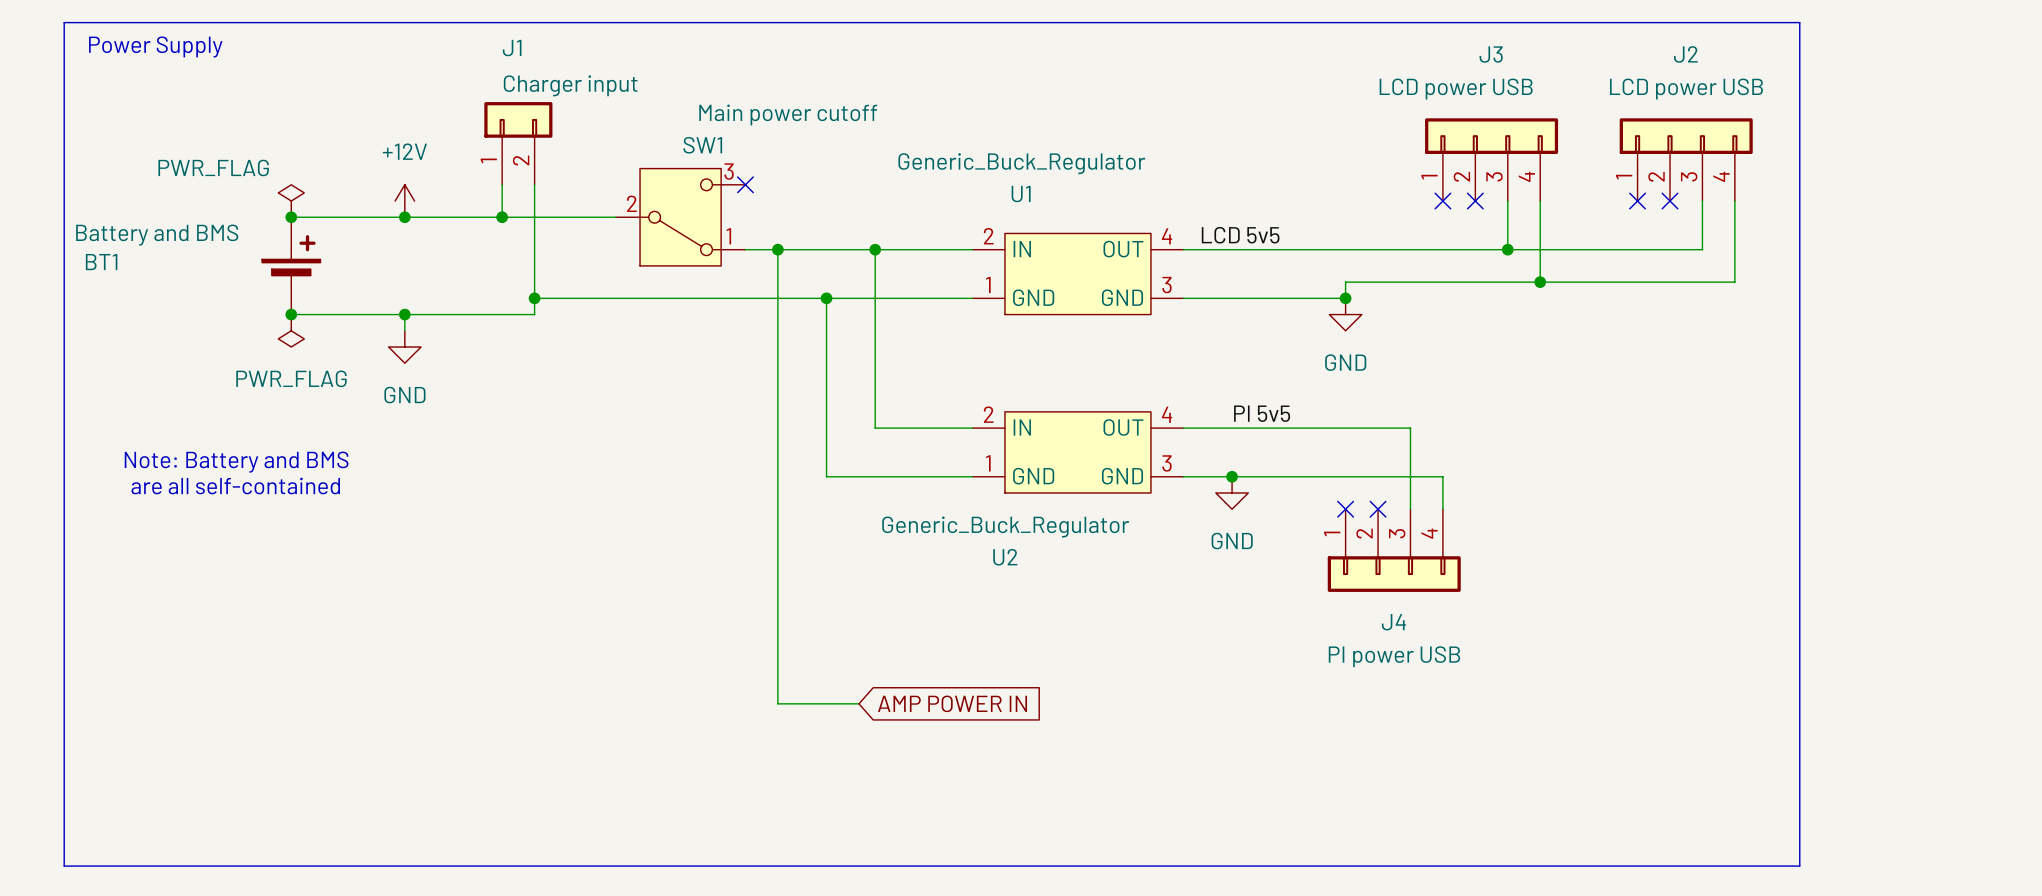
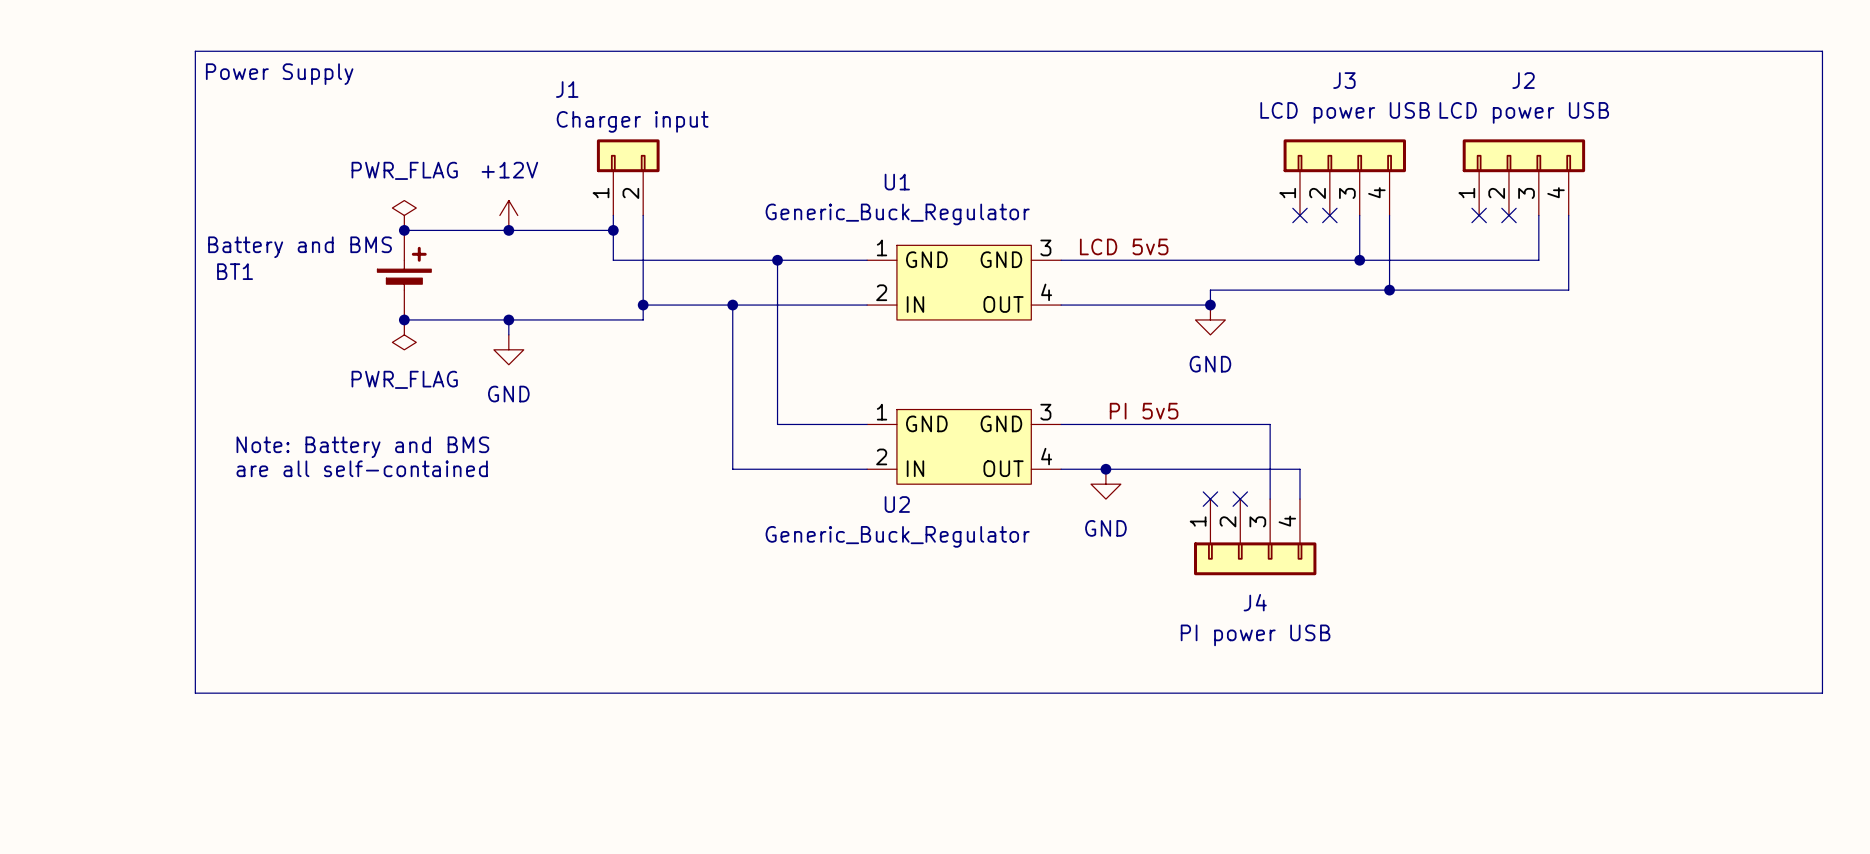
line: (242, 22) (64, 22) (64, 866) (1799, 866) (1799, 22) -> (195, 51) (195, 693) (1822, 693) (1822, 51) (1628, 51)
text position: Power Supply (155, 46) -> Power Supply (279, 74)
J1 name position: J1 (512, 48) -> J1 (567, 89)
J1 value position: Charger input (570, 85) -> Charger input (632, 121)
J3 value position: LCD power USB (1456, 89) -> LCD power USB (1345, 112)
J1 position: (518, 143) -> (628, 177)
U1 value position: Generic_Buck_Regulator (1021, 163) -> Generic_Buck_Regulator (897, 214)
wire: (502, 184) (502, 217) -> none
wire: (534, 184) (534, 314) -> (643, 215) (643, 319) (464, 319)
no-connect mark: (745, 184) -> none
U1 name position: U1 (1021, 194) -> U1 (897, 182)
power symbol: PWR_FLAG (291, 201) -> none
power symbol position: +12V (404, 201) -> +12V (508, 215)
power symbol: none -> PWR_FLAG (404, 215)
wire: (291, 217) (469, 217) -> none
junction: (291, 217) -> none
junction: (404, 217) -> none
junction: none -> (404, 230)
junction: (502, 217) -> none
junction: none -> (508, 230)
SW1: Main power cutoff (680, 217) -> none
junction: none -> (613, 230)
wire: (777, 249) (777, 703) (858, 703) -> none
junction: (777, 249) -> none
BT1 position: (291, 265) -> (404, 275)
U1 flip: as is (1077, 274) -> up-down (964, 282)
wire: (534, 298) (729, 298) -> none
junction: (534, 298) -> none
junction: none -> (643, 305)
wire: (291, 314) (469, 314) -> none
junction: (291, 314) -> none
wire: (404, 314) (404, 330) -> (508, 319) (508, 334)
junction: (404, 314) -> none
junction: none -> (404, 319)
junction: none -> (508, 319)
power symbol: PWR_FLAG (291, 330) -> none
power symbol: none -> PWR_FLAG (404, 334)
power symbol position: GND (404, 347) -> GND (508, 349)
U2 flip: as is (1077, 452) -> up-down (964, 446)
text position: Note: Battery and BMS (236, 462) -> Note: Battery and BMS (362, 447)
text position: are all self-contained (235, 486) -> are all self-contained (362, 468)
U2 name position: U2 (1005, 557) -> U2 (897, 504)
global label: AMP POWER IN (952, 703) -> none

